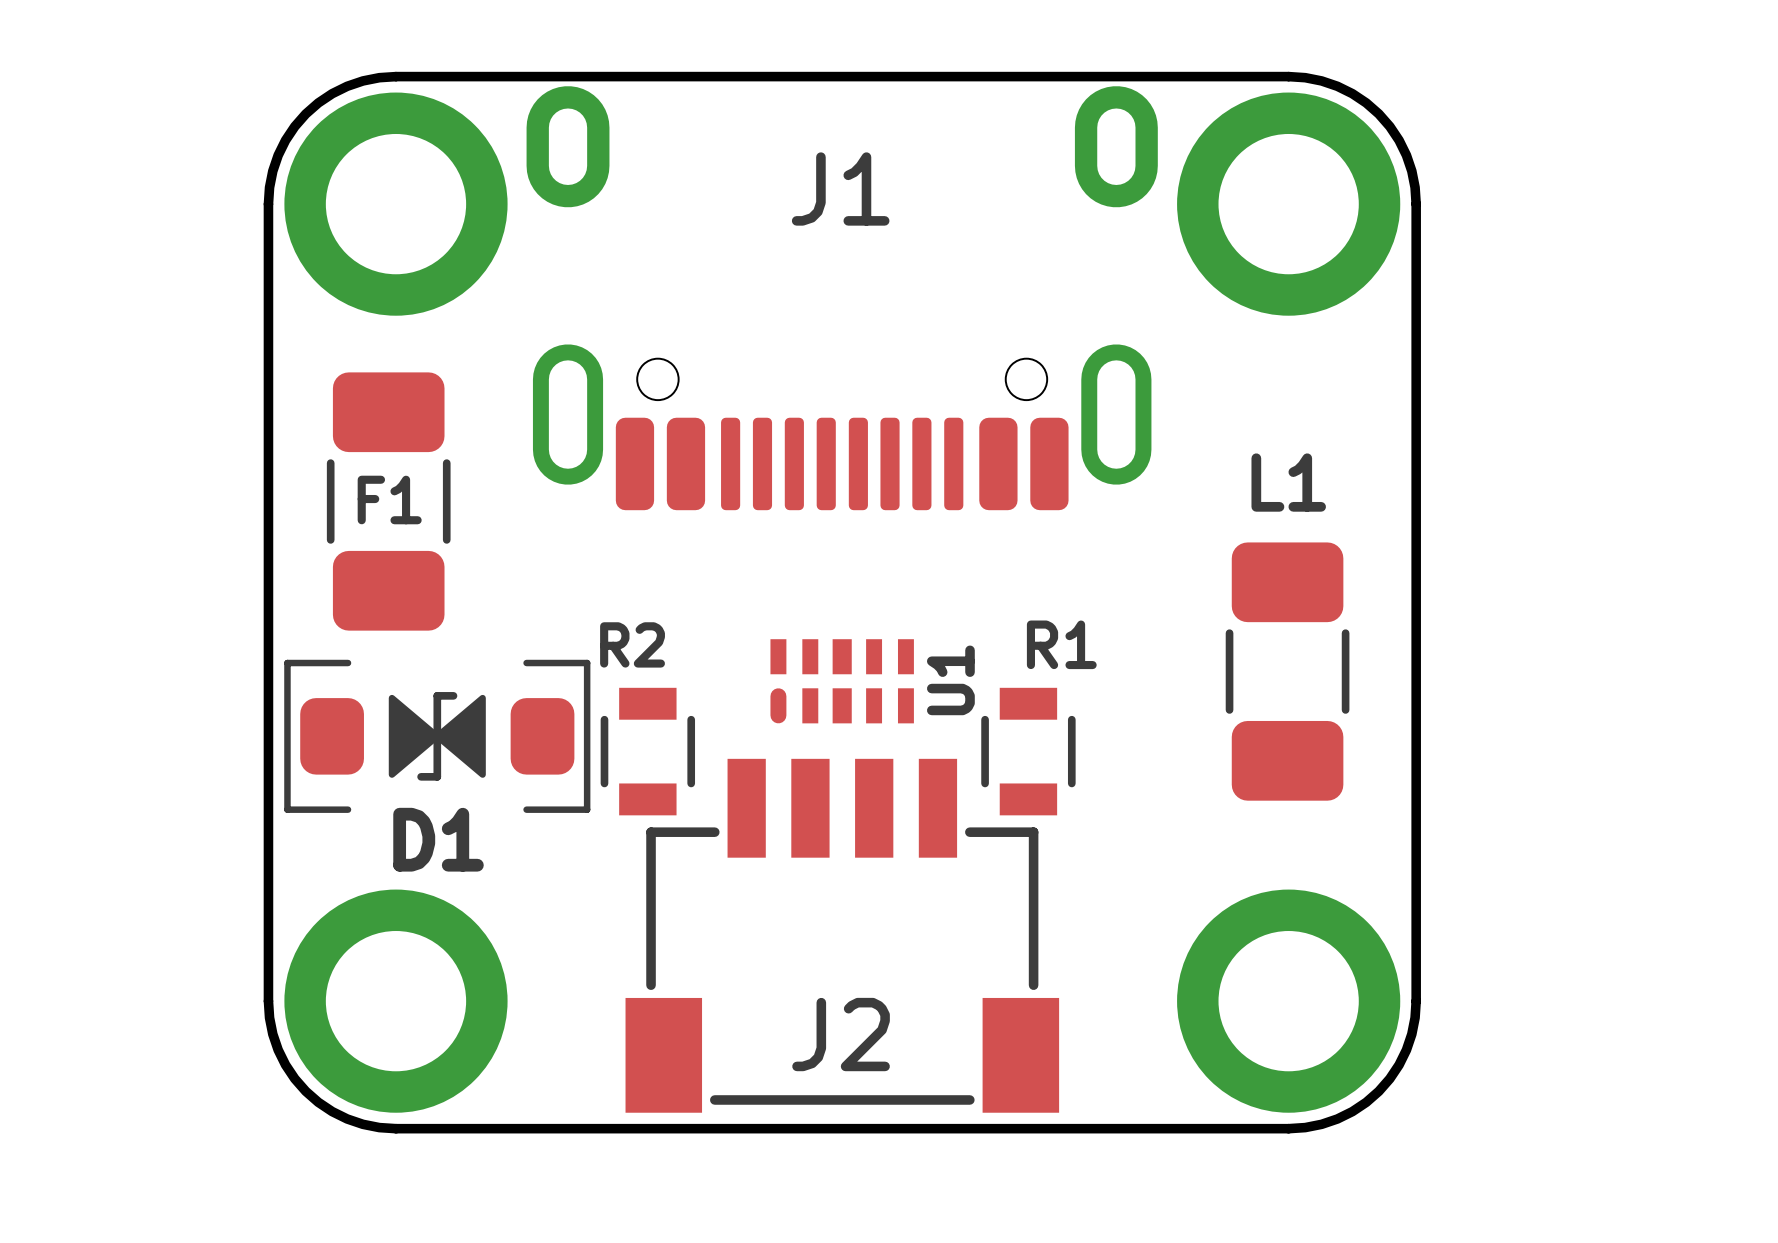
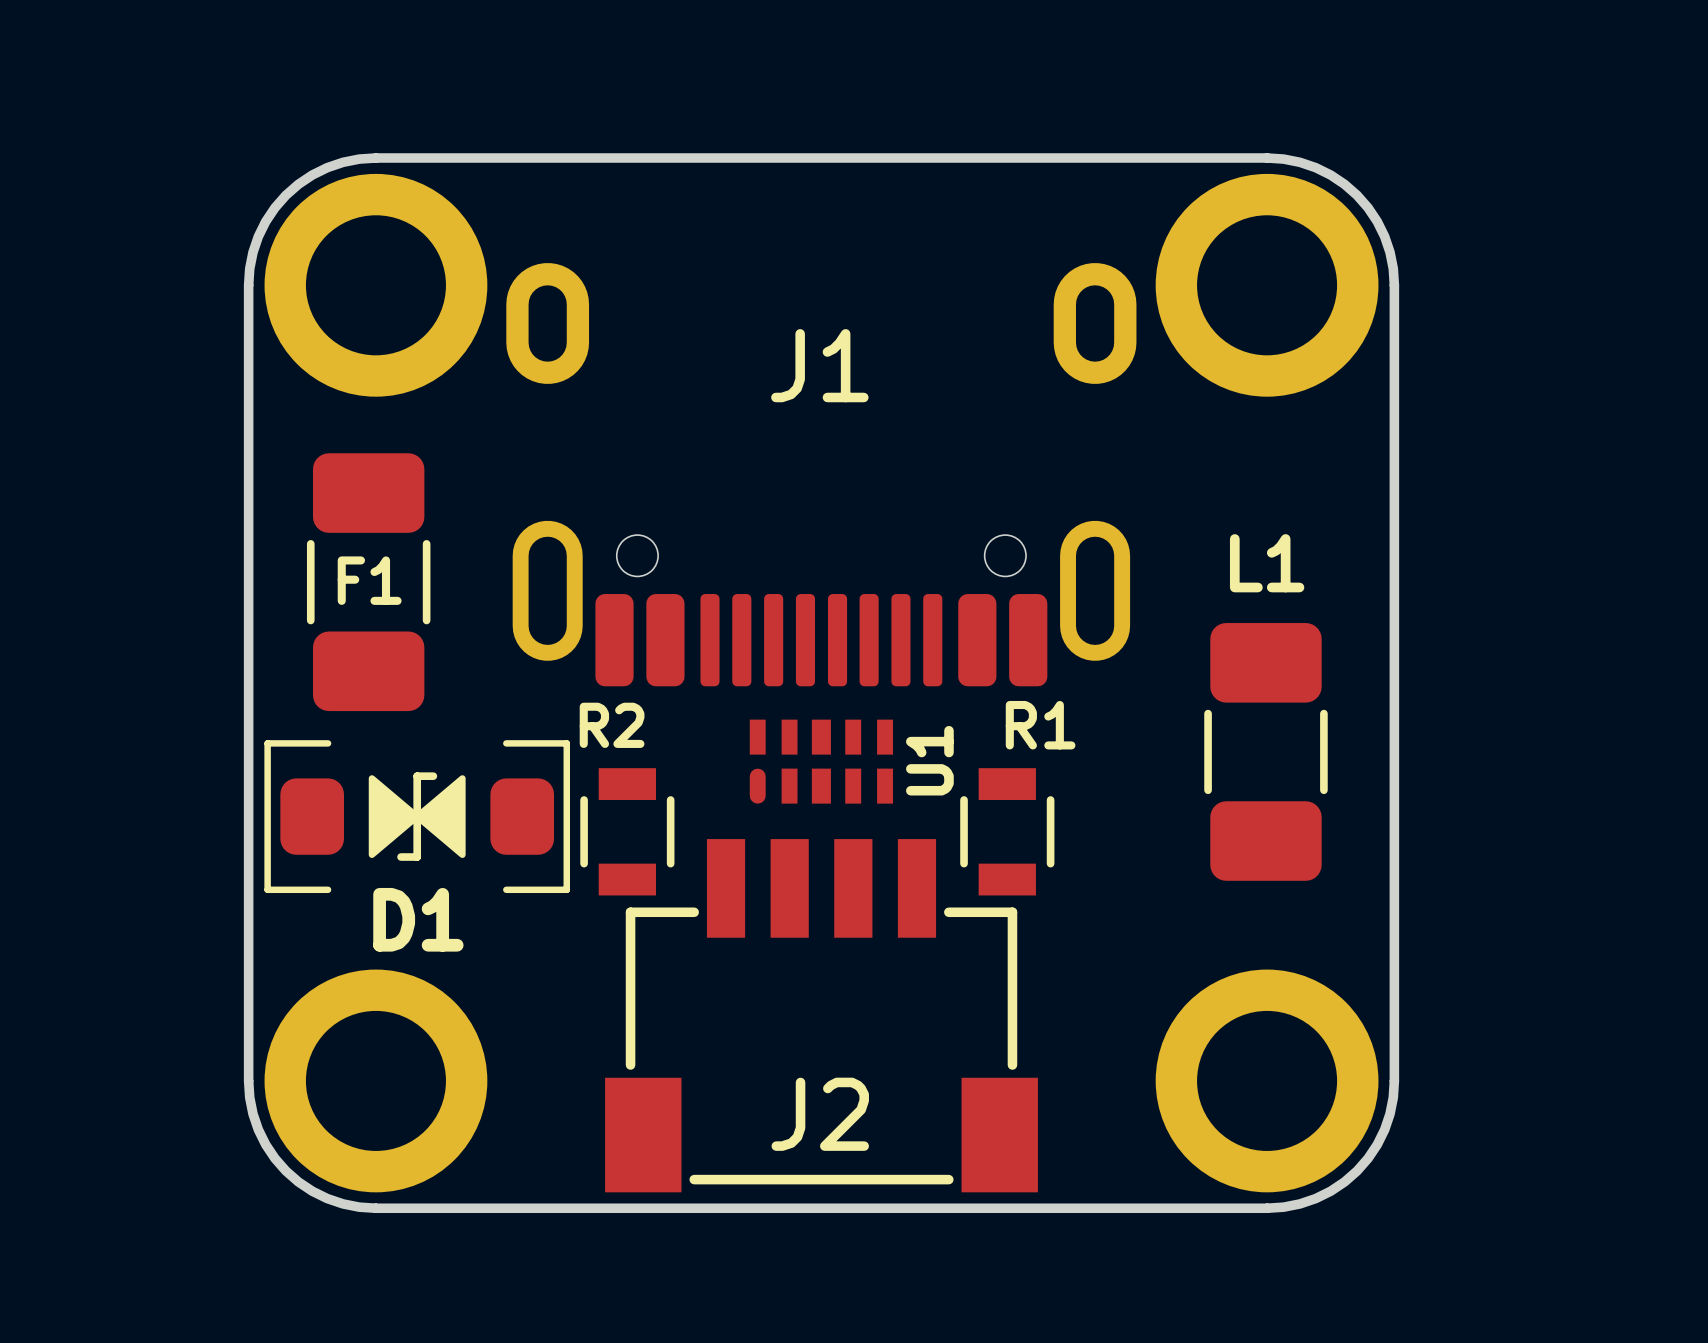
J1 position: (842, 298) -> (821, 474)

